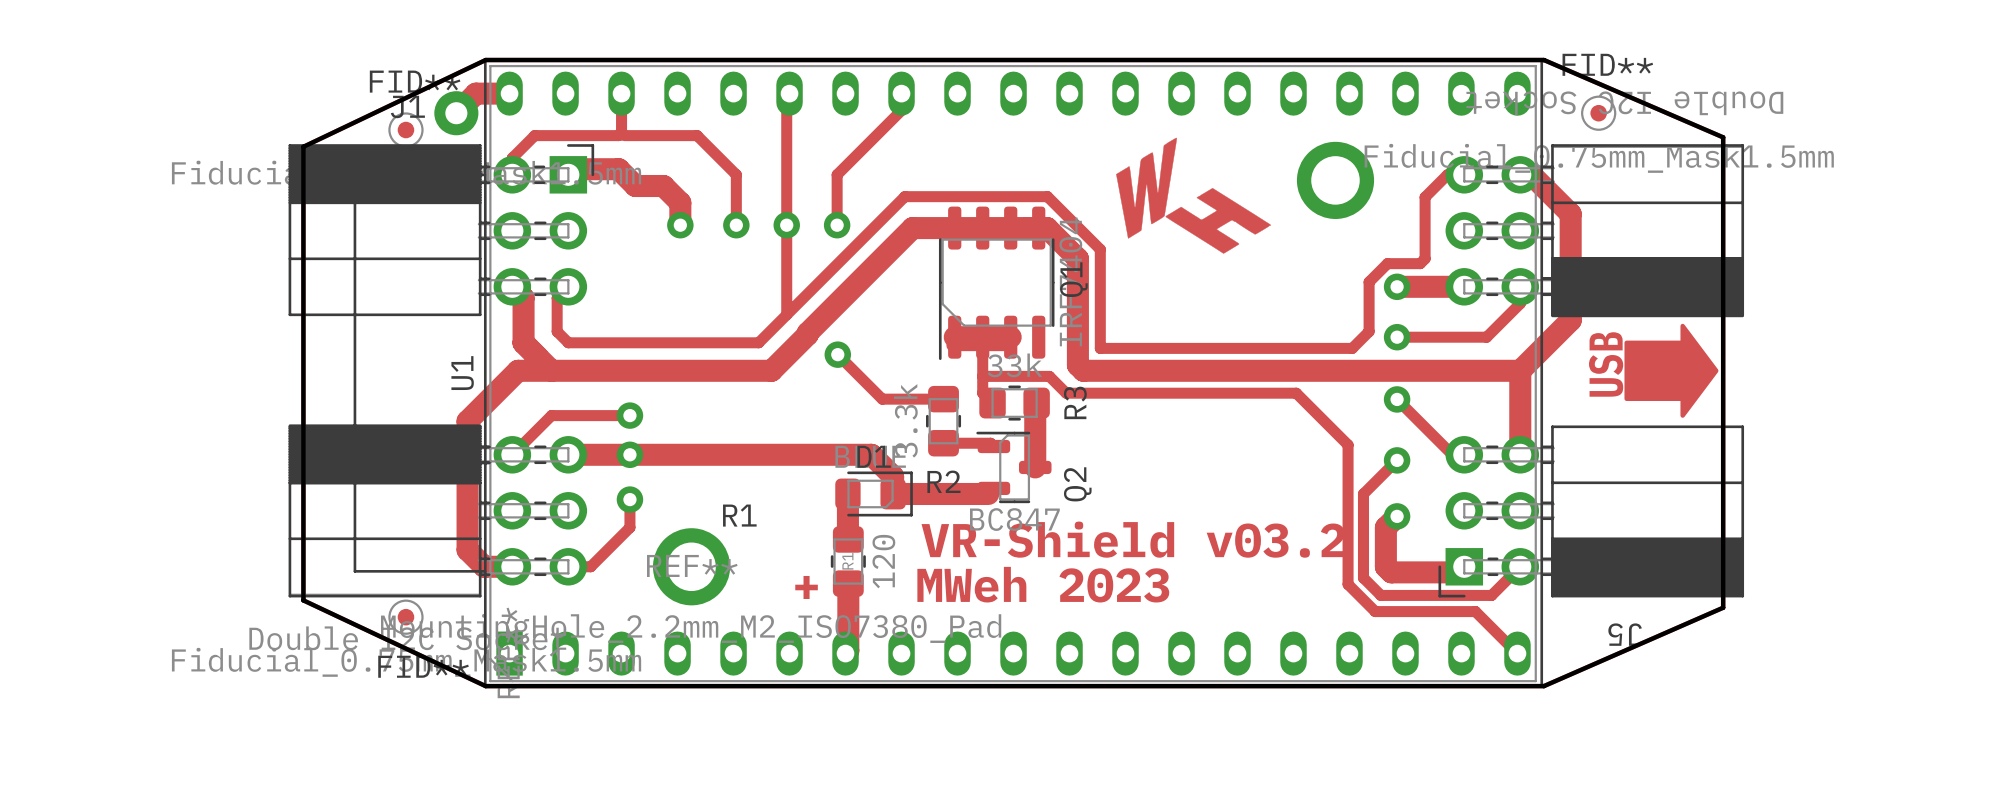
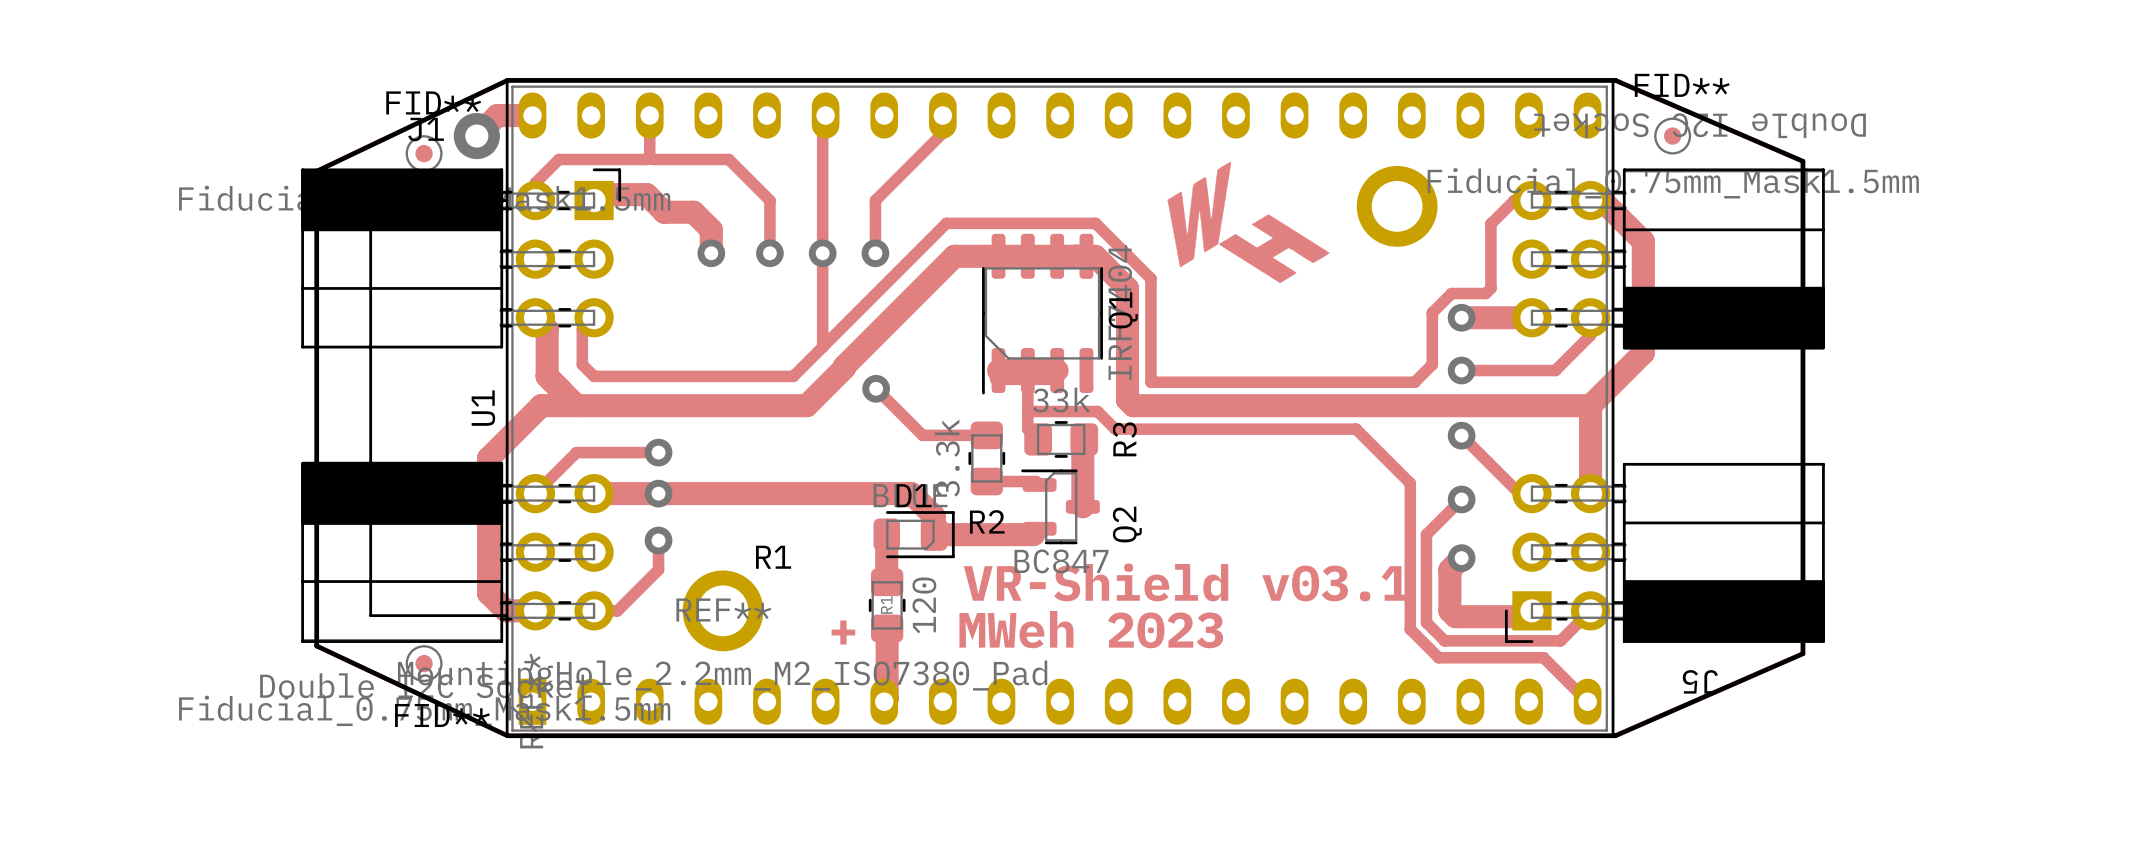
drawing: [1624, 323, 1719, 418] -> none
text: USB (1606, 364) -> none
text: VR-Shield v03.2 (1133, 539) -> VR-Shield v03.1 (1186, 582)

